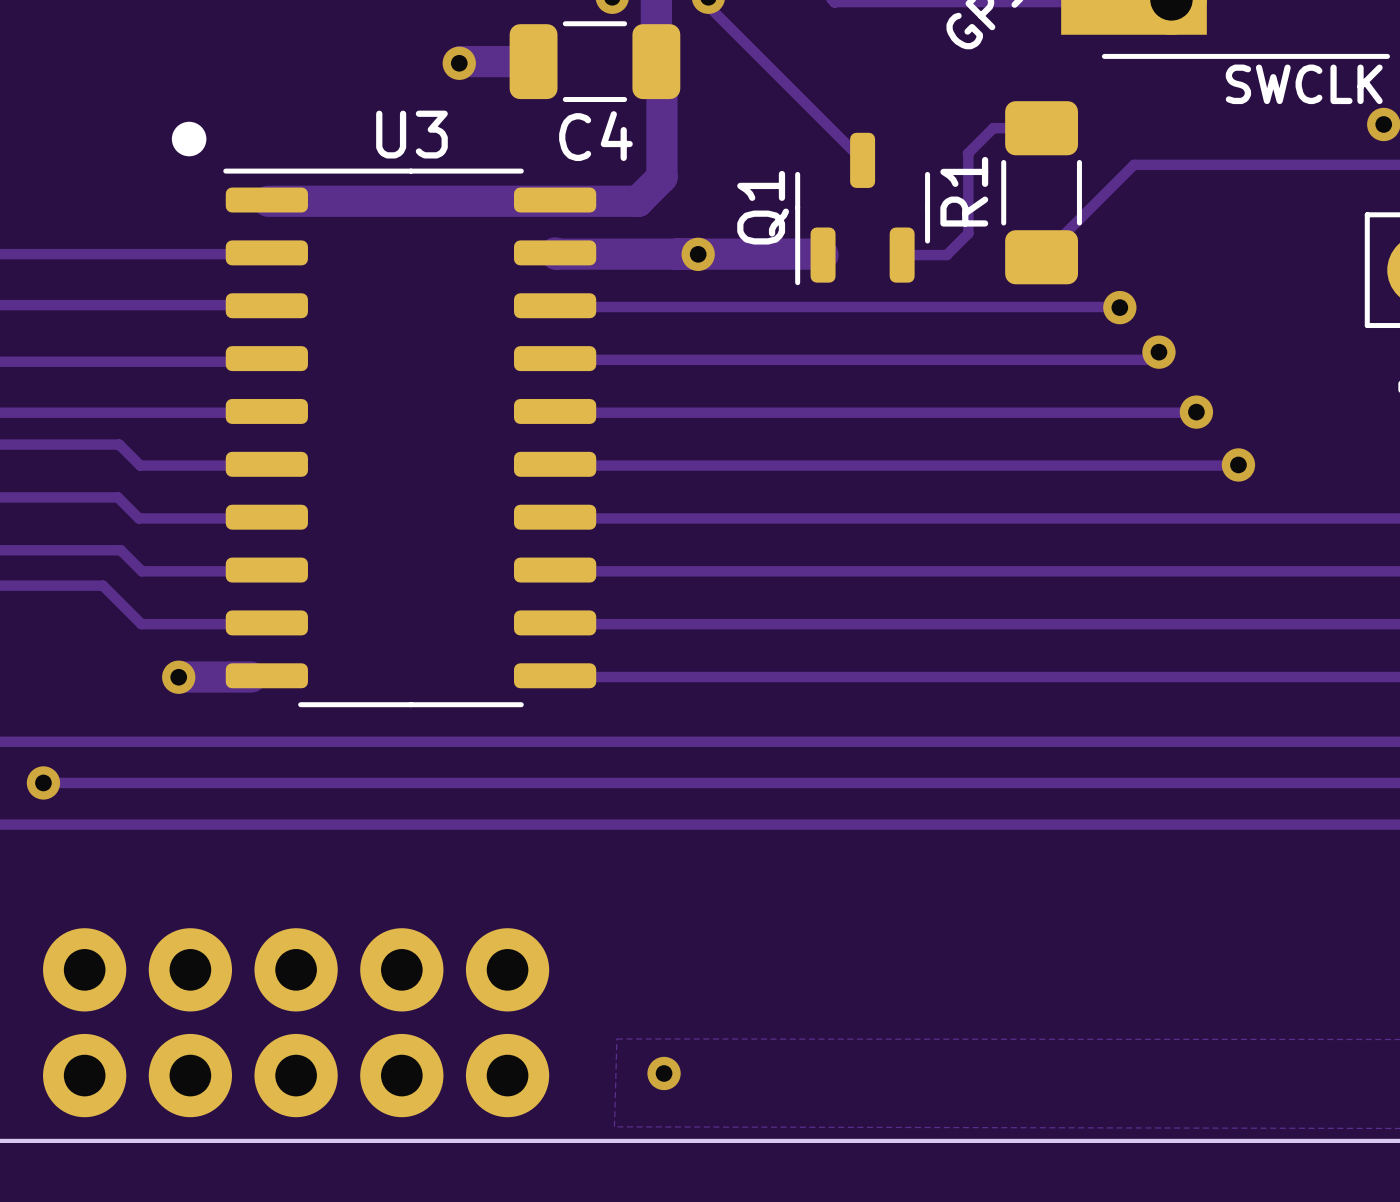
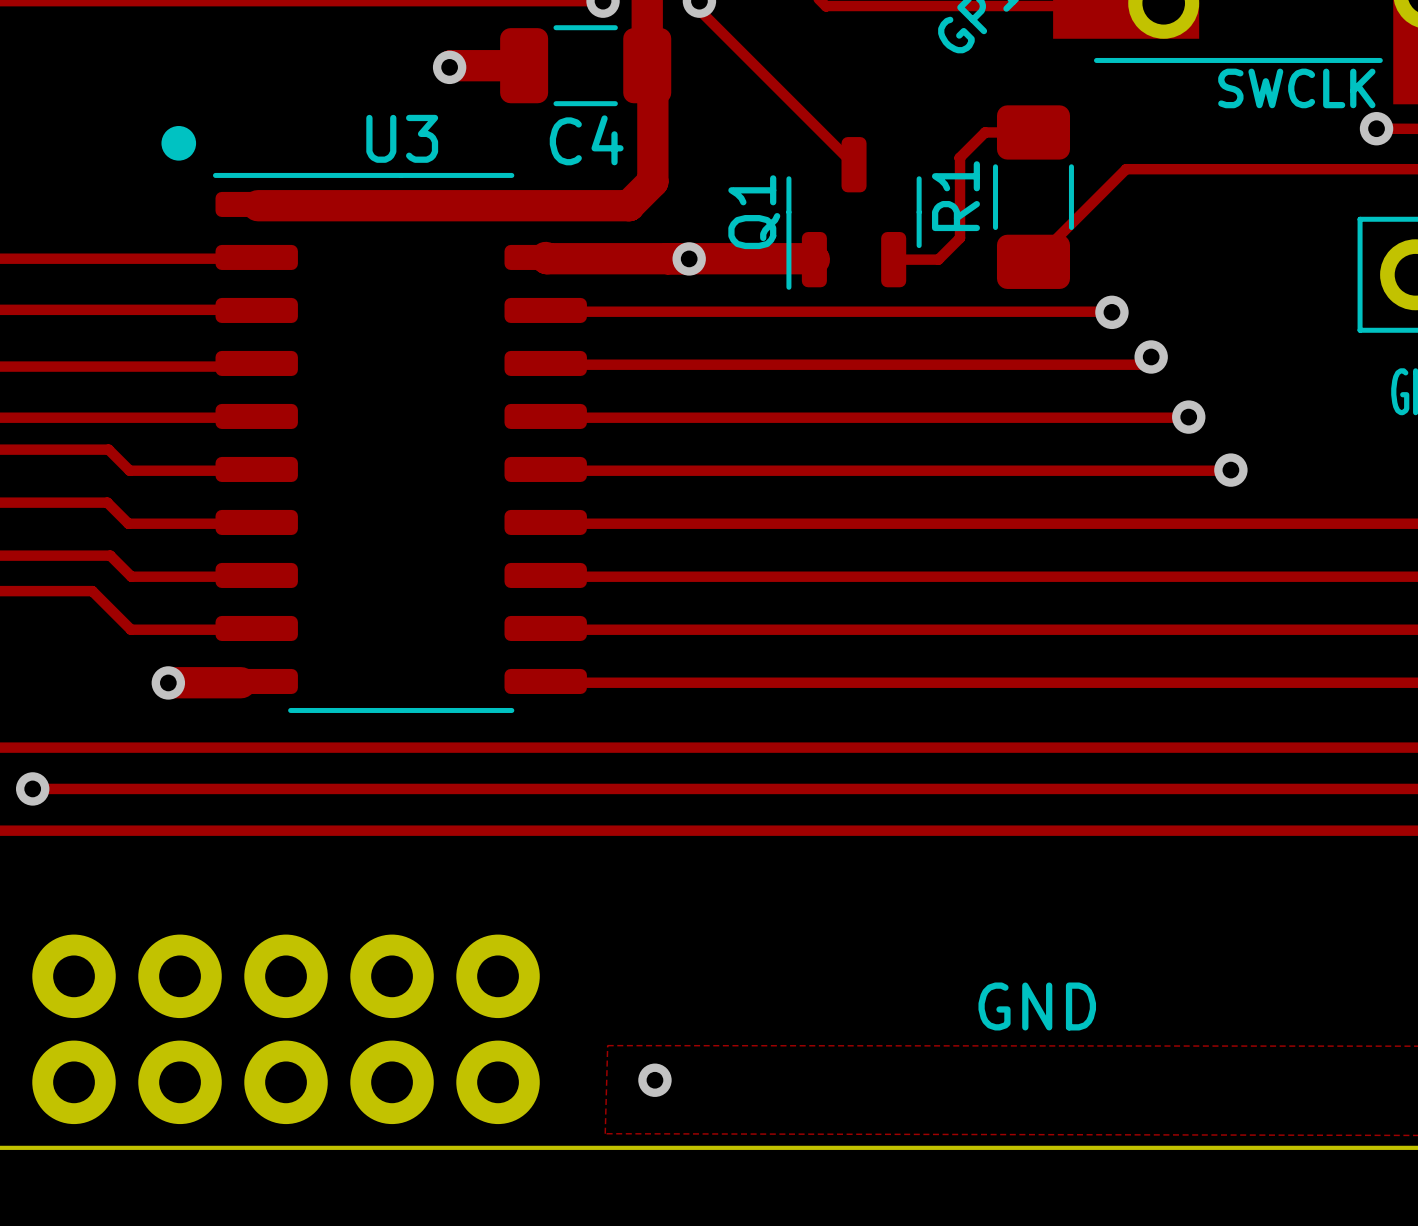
text: none -> GND (1037, 1006)

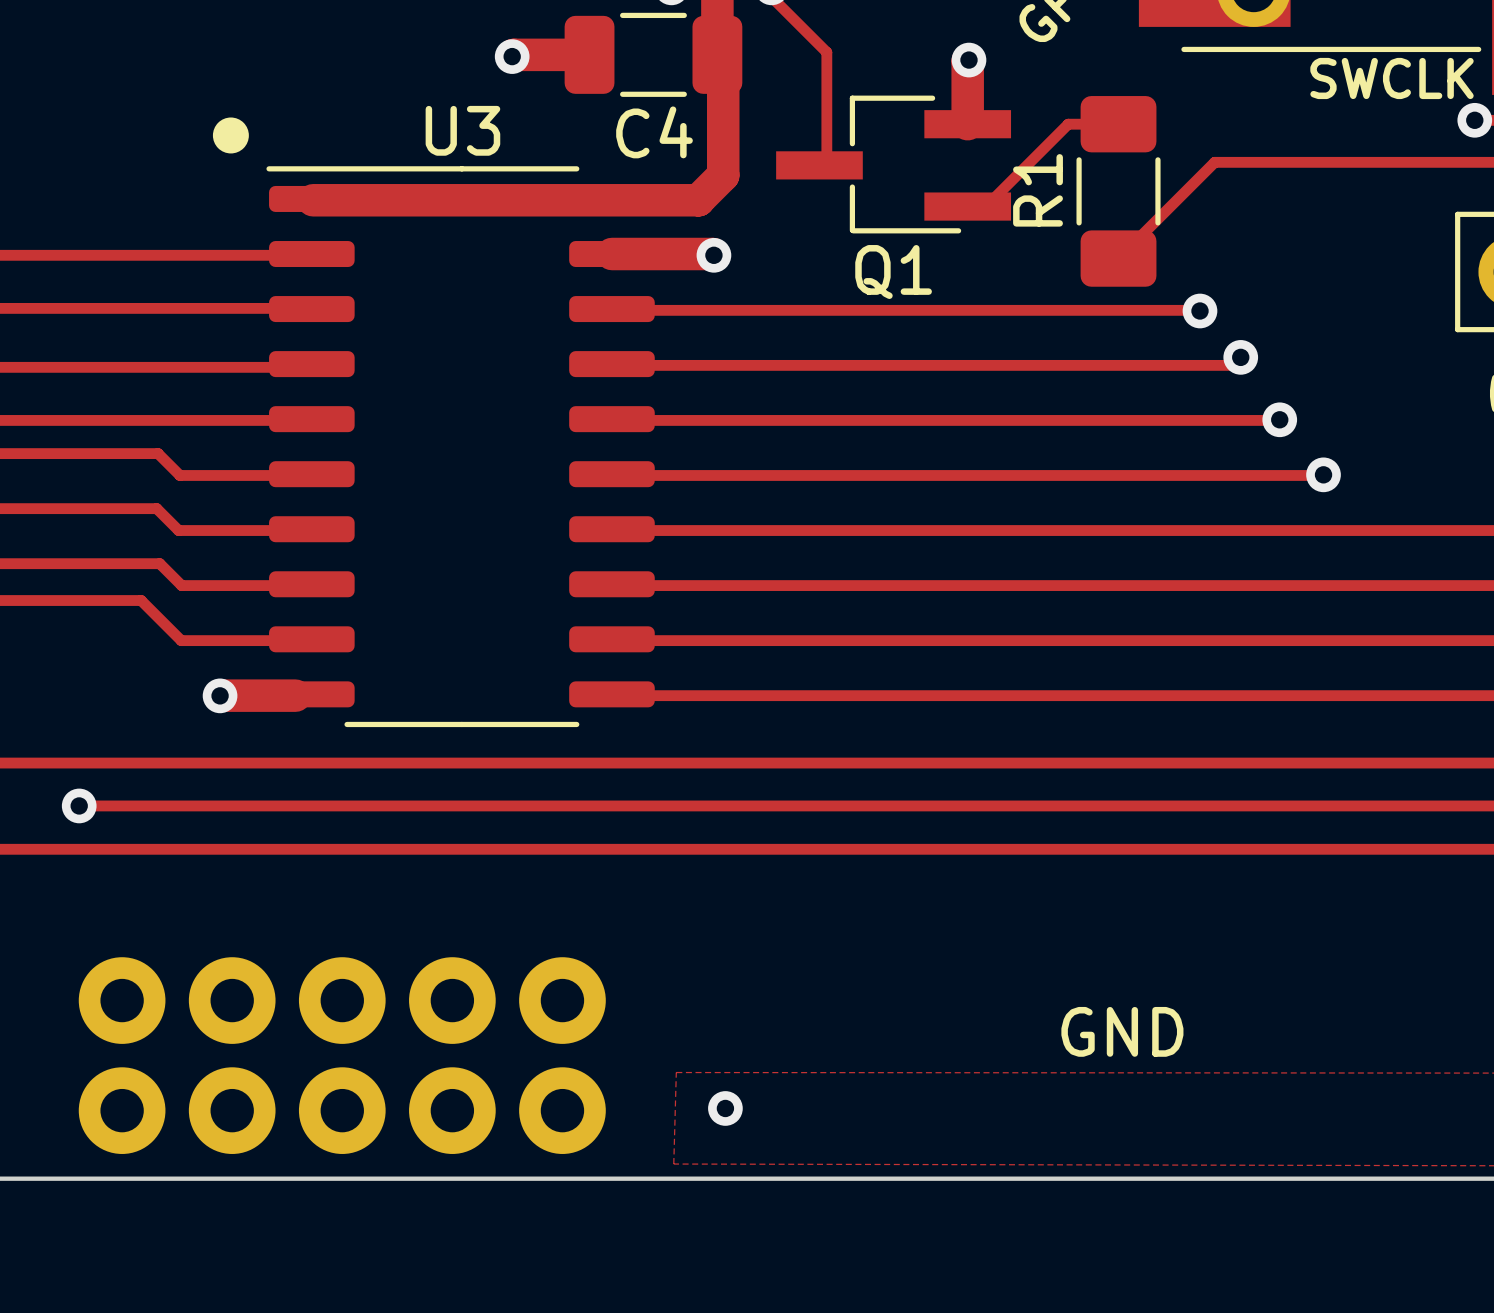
track: (752, 63) (854, 164) -> (826, 52) (826, 158) (819, 165)
track: none -> (968, 60) (967, 124)
via: none -> (968, 60)
Q1 footprint: [786, 137, 922, 290] -> [776, 95, 1012, 234]
track: (960, 158) (960, 238) (938, 259) (893, 259) -> (1041, 150) (985, 206) (967, 206)
Q1 name position: Q1 (754, 212) -> Q1 (893, 272)
track: (545, 257) (814, 259) -> (611, 254) (713, 255)
via position: (689, 258) -> (713, 255)

